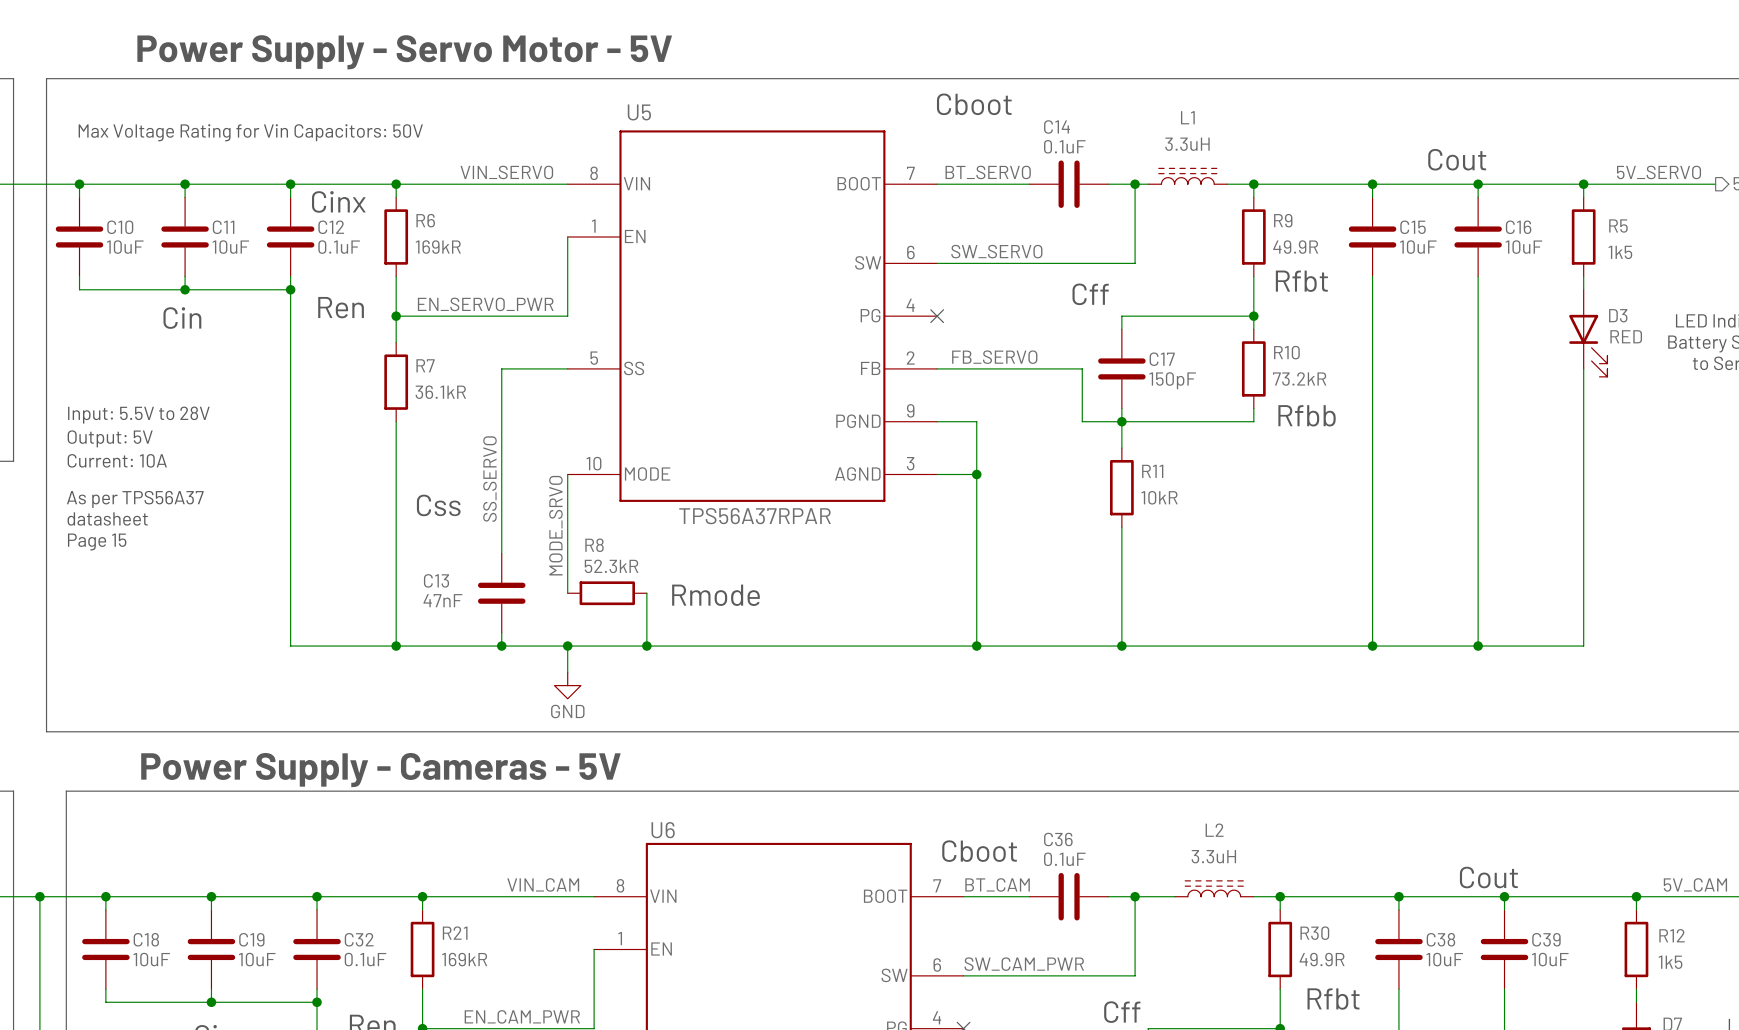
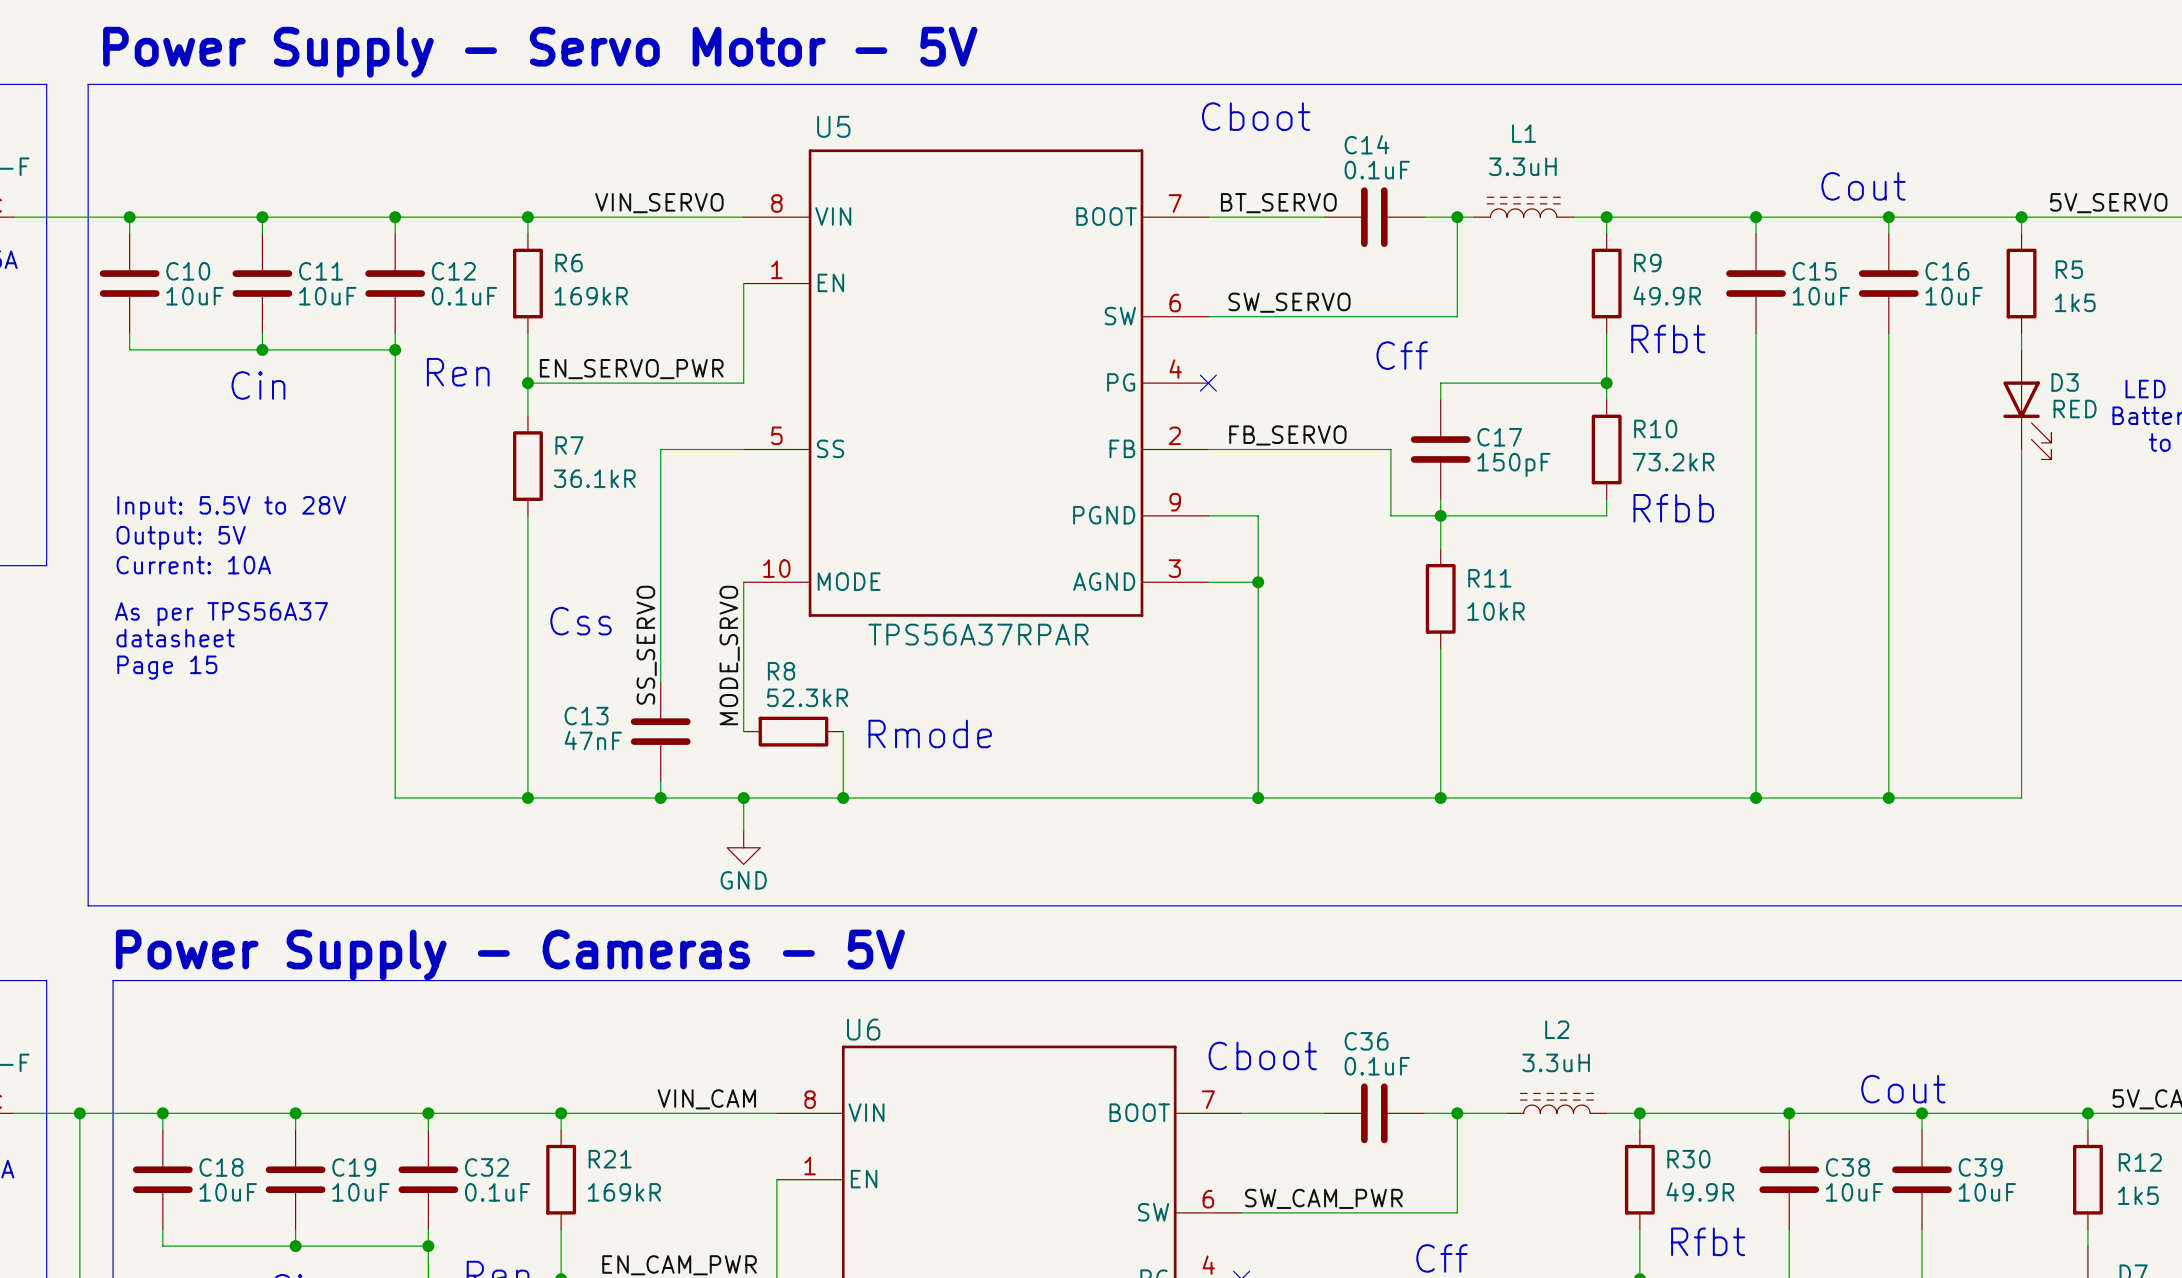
text: Max Voltage Rating for Vin Capacitors: 50V (250, 132) -> none
text: Cinx (338, 201) -> none
label position: SS_SERVO (489, 479) -> SS_SERVO (646, 645)
label: BT_CAM (997, 884) -> none

